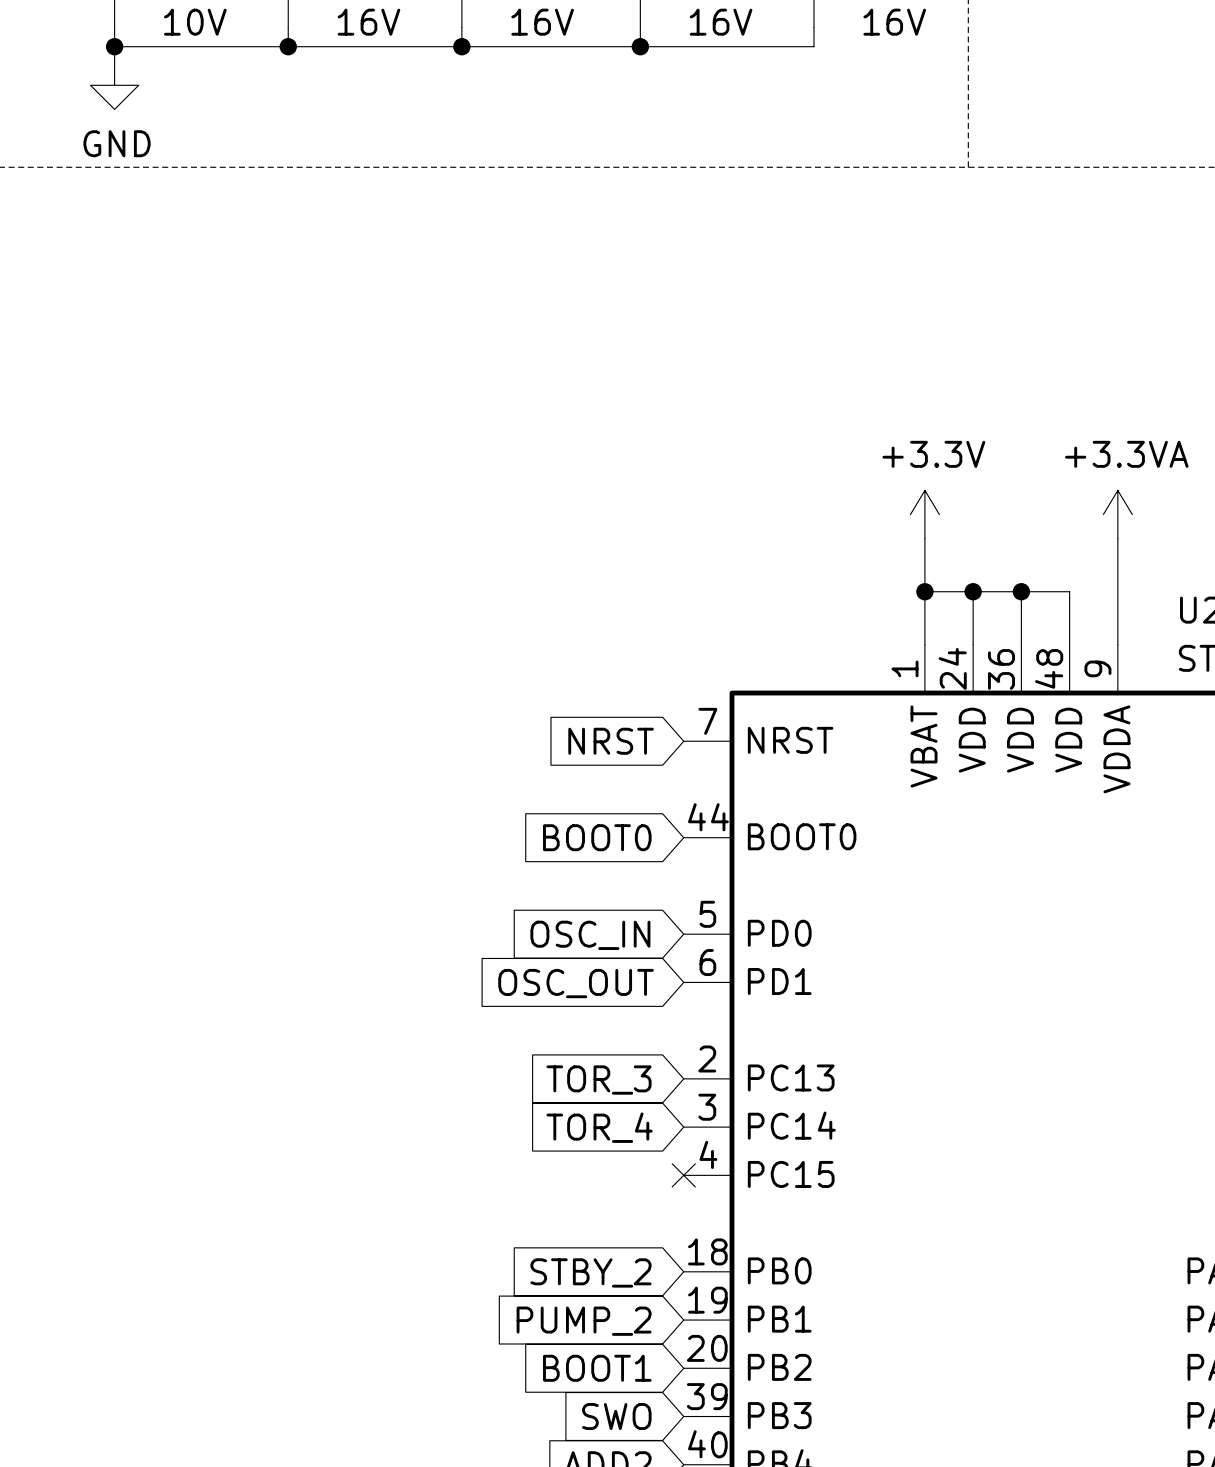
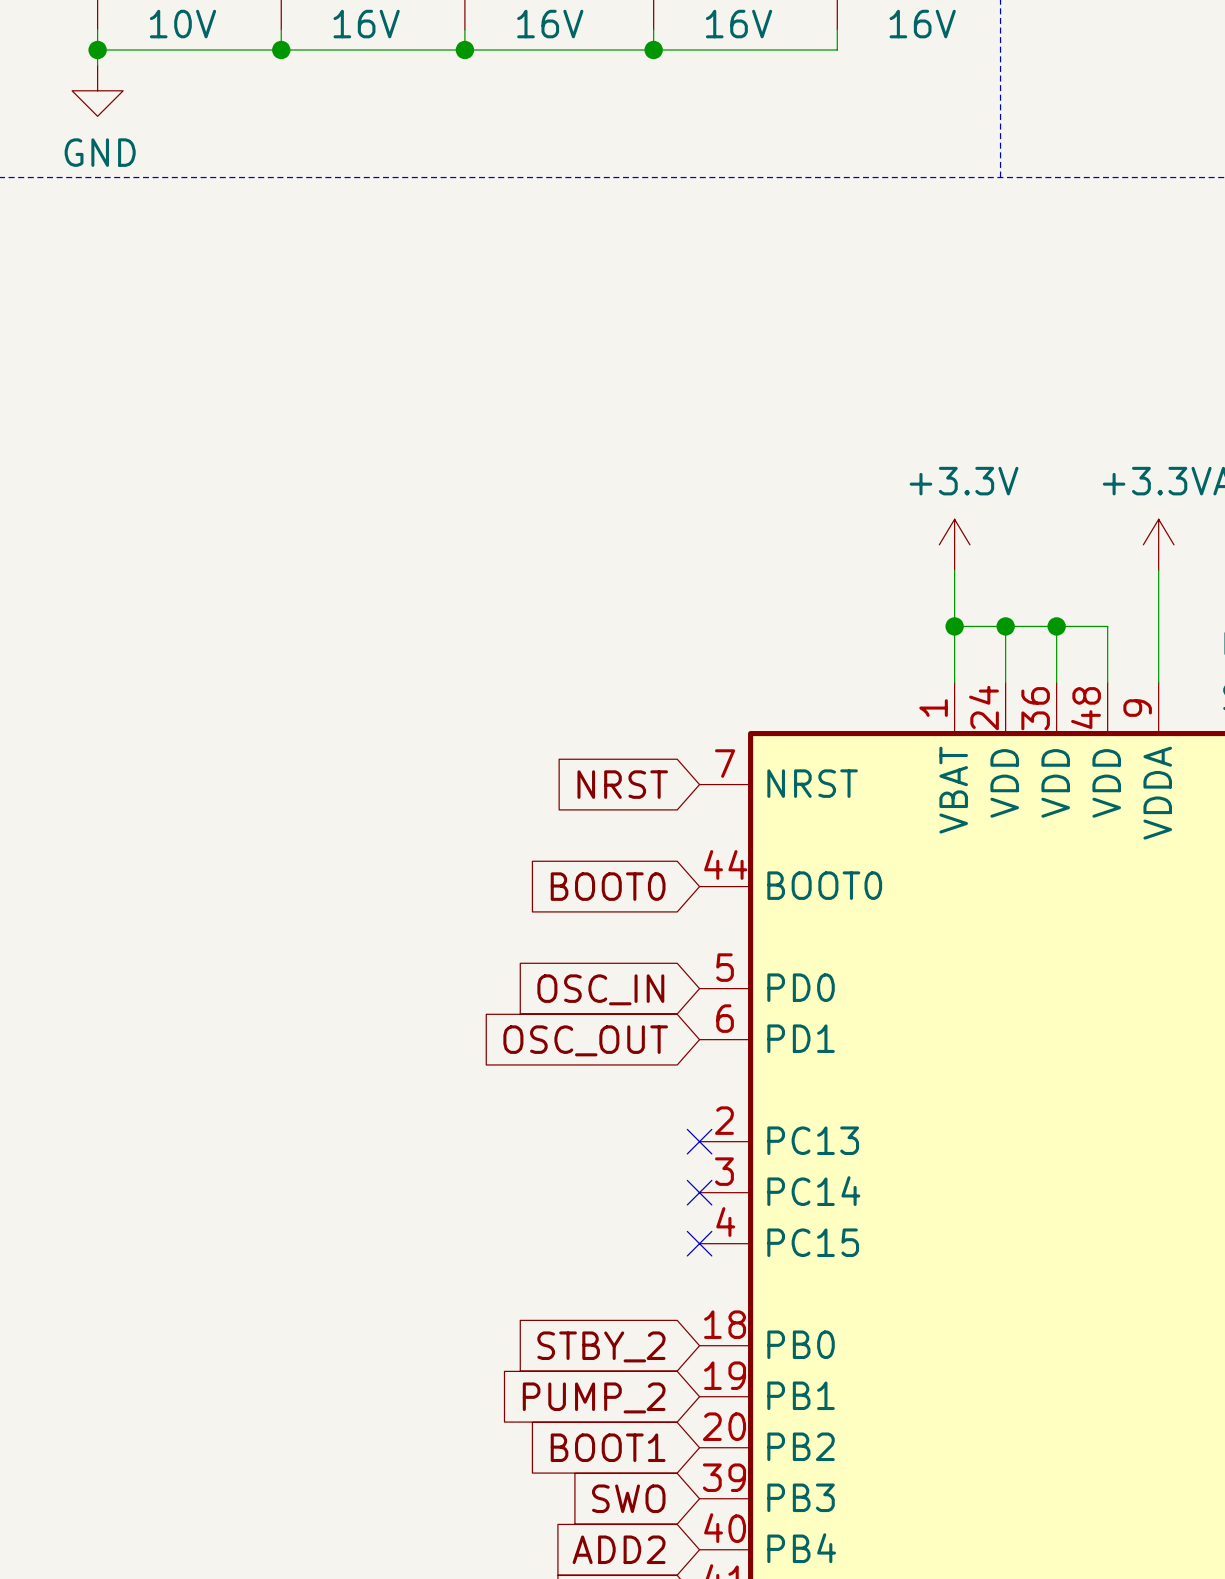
no-connect mark: none -> (699, 1141)
global label: TOR_3 (599, 1080) -> none
global label: TOR_4 (599, 1127) -> none
no-connect mark: none -> (699, 1192)

